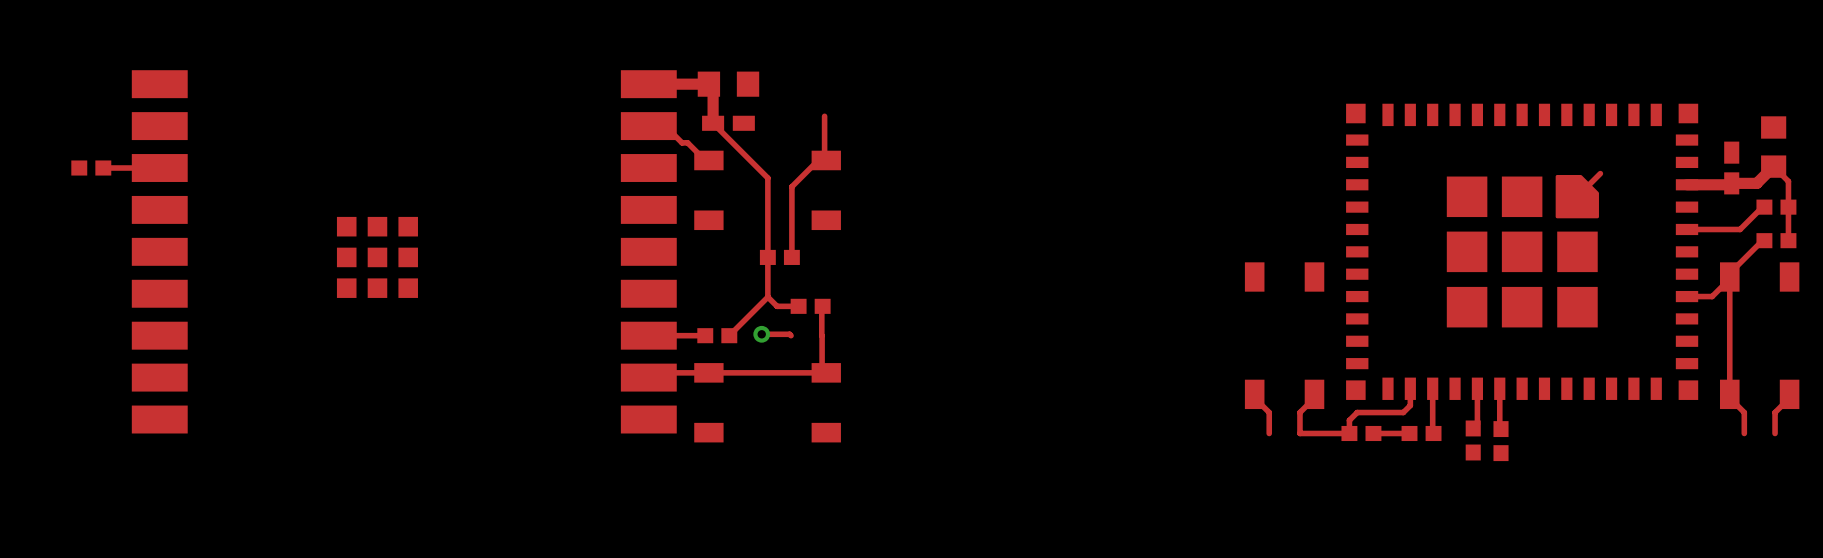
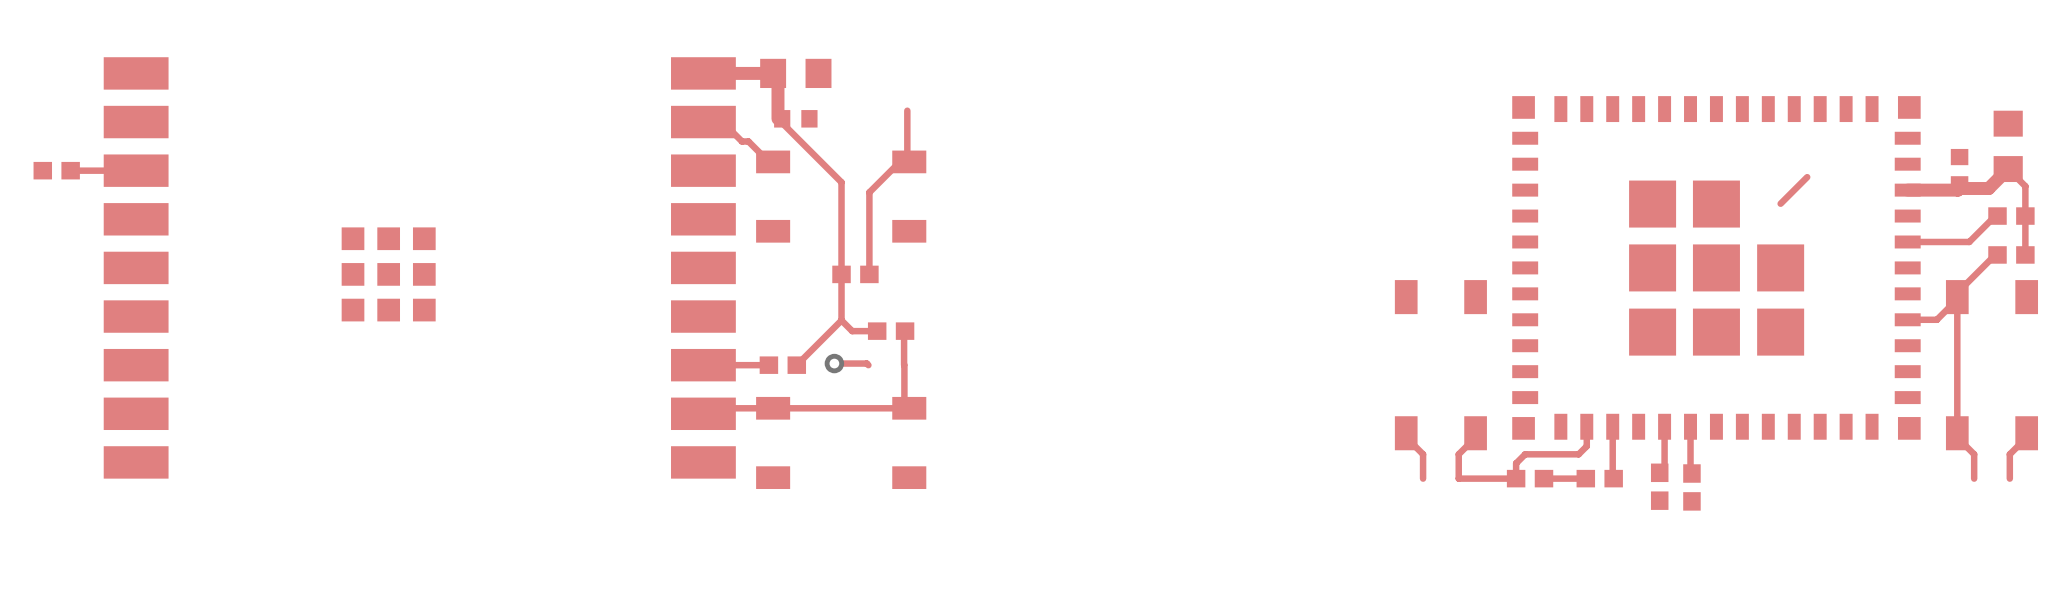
part footprint: [1346, 103, 1699, 400] -> [1512, 96, 1921, 440]
part footprint: [702, 115, 755, 131] -> [774, 110, 818, 128]
part footprint: [1724, 141, 1740, 195] -> [1950, 148, 1969, 193]

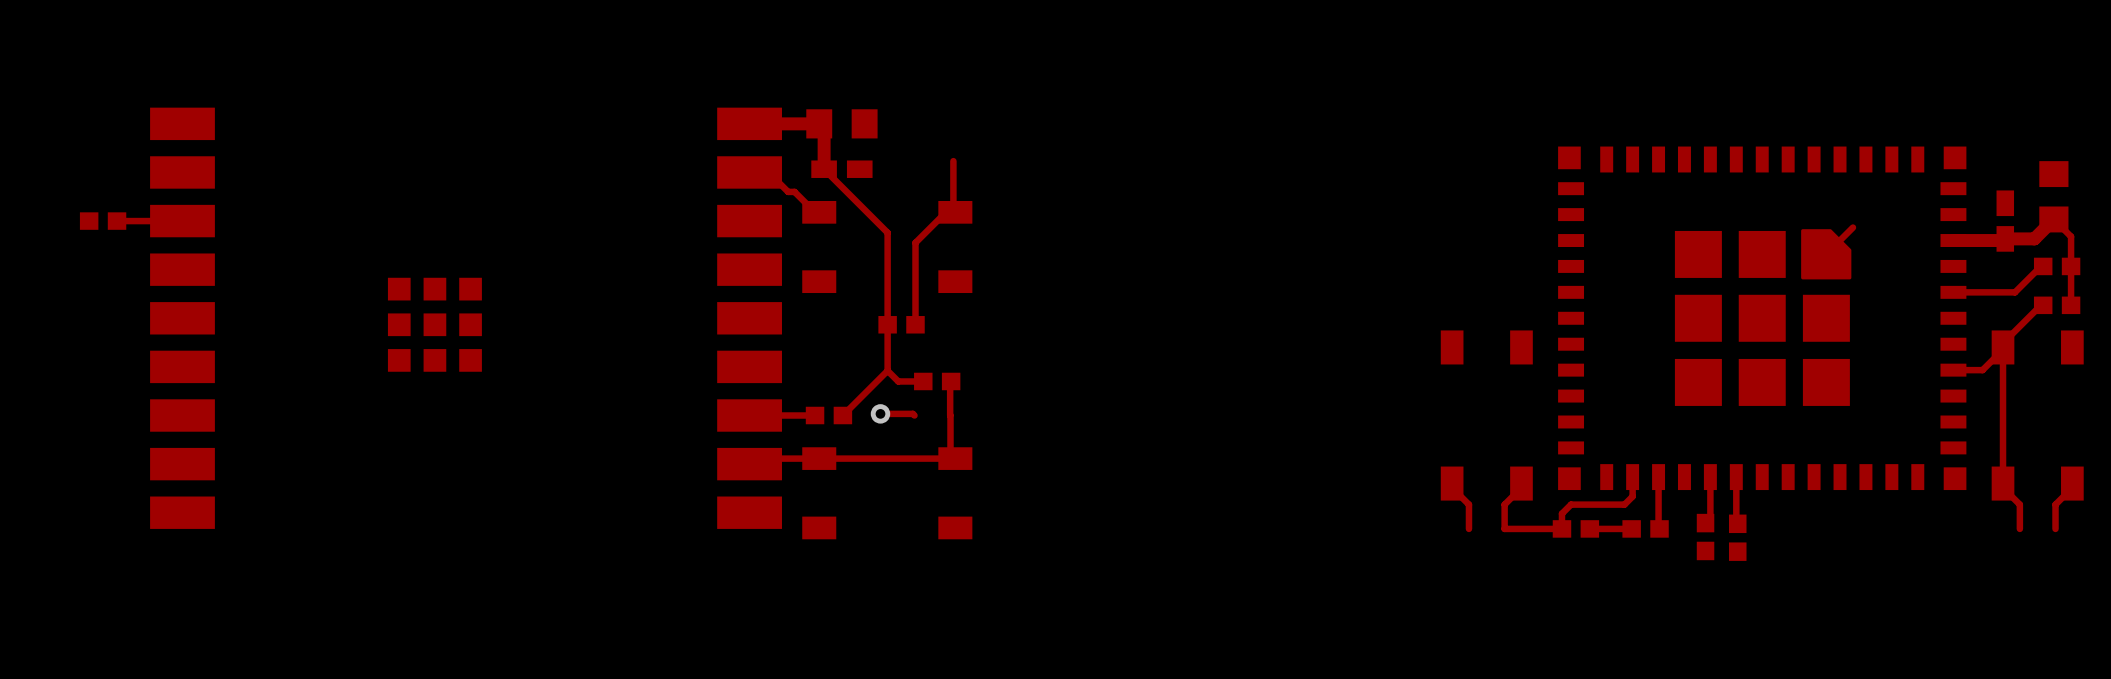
part footprint: [1512, 96, 1921, 440] -> [1558, 146, 1967, 491]
part footprint: [774, 110, 818, 128] -> [811, 160, 873, 178]
part footprint: [1950, 148, 1969, 193] -> [1996, 190, 2015, 252]

